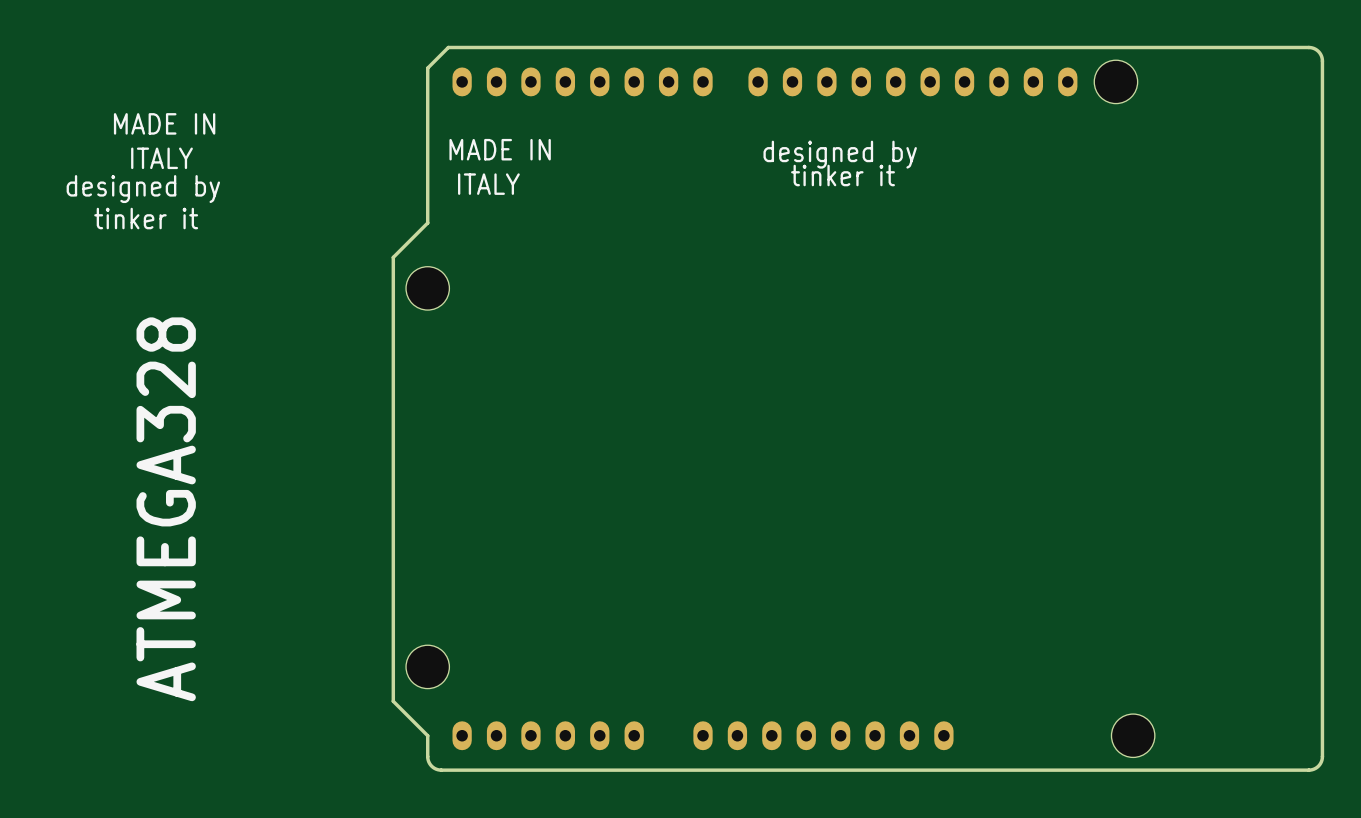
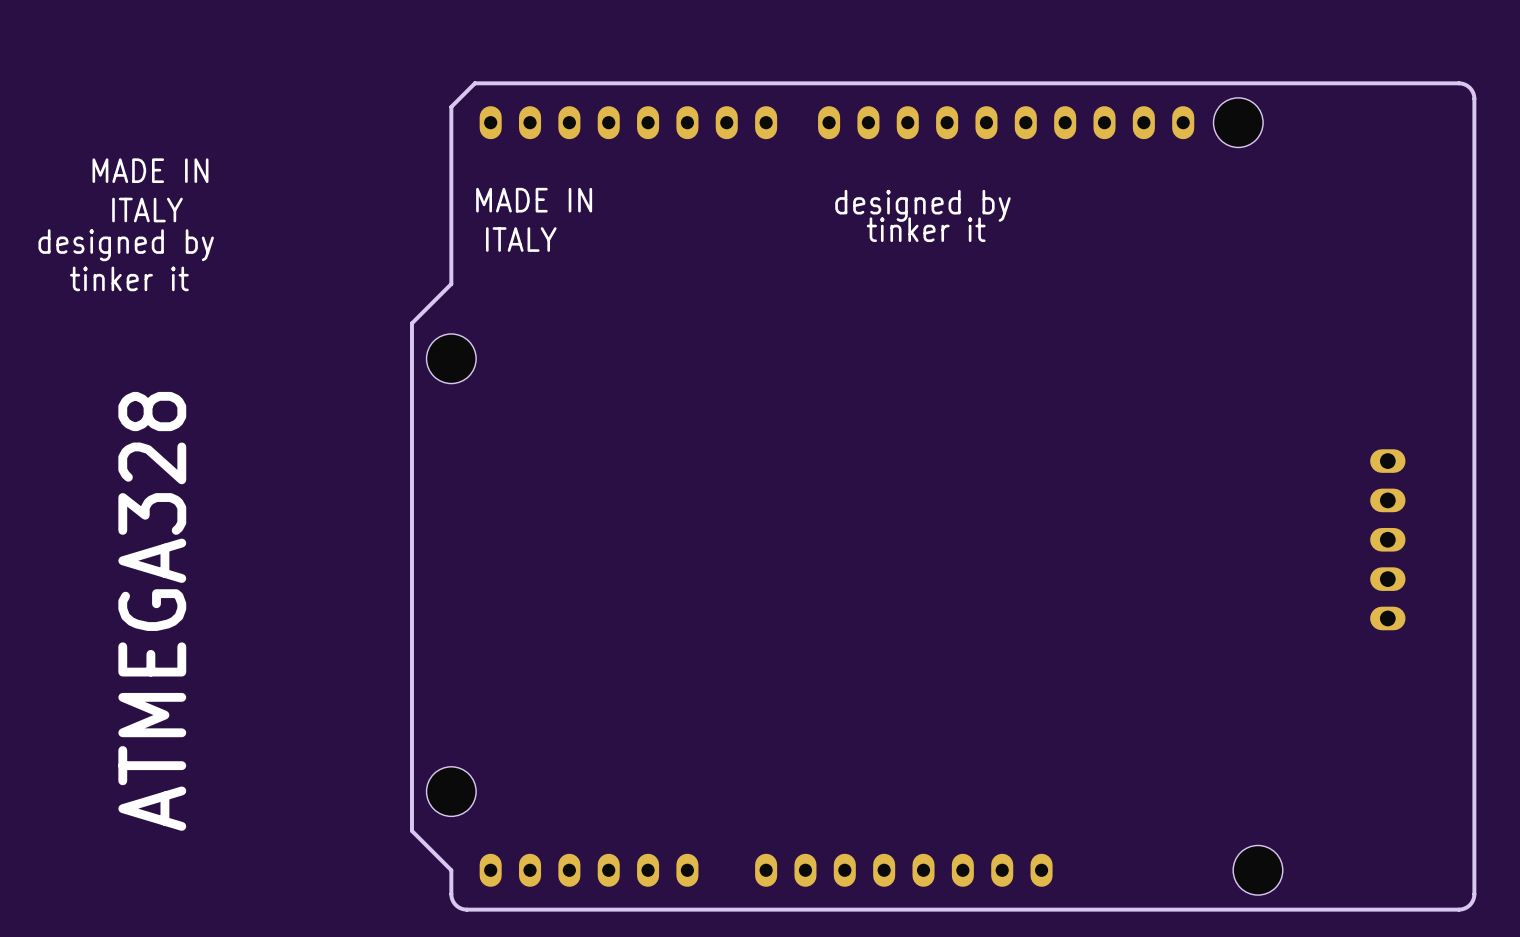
part: none -> (1387, 539)

